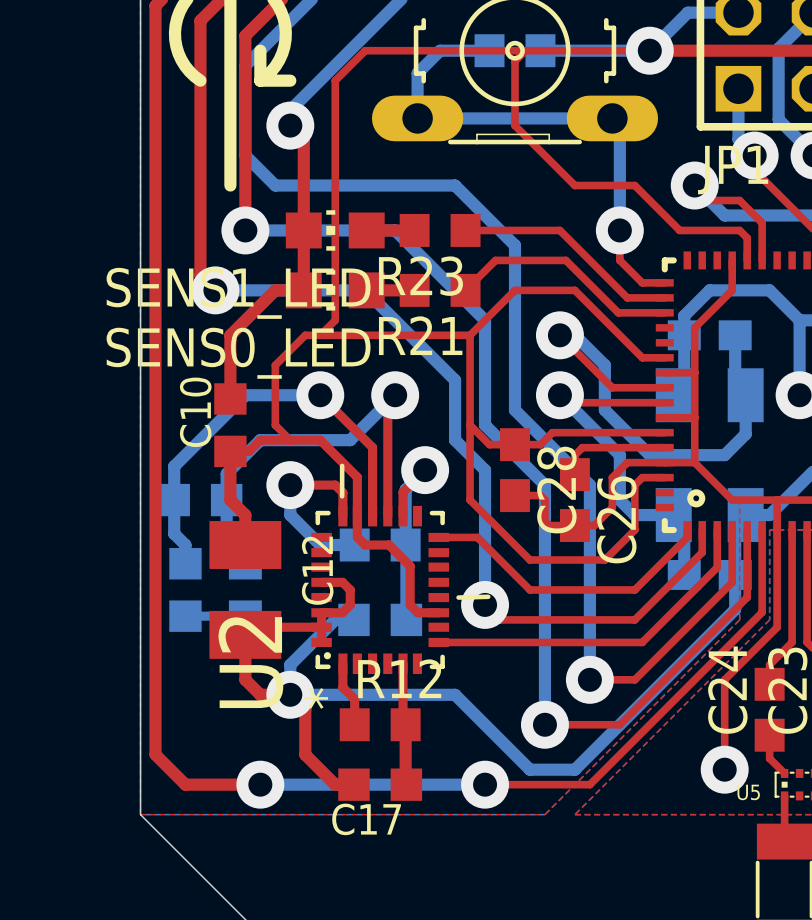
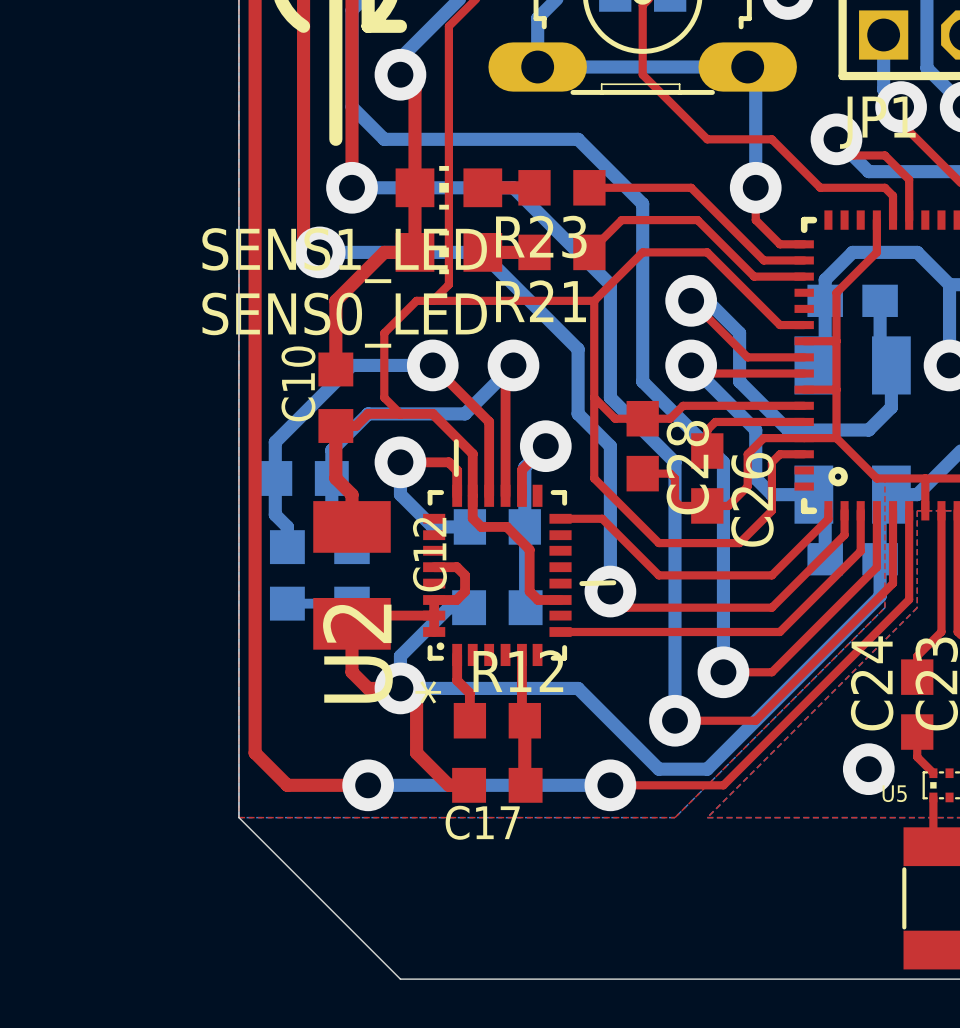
top track: (777, 530) (777, 627) (724, 679) (724, 769) -> none

